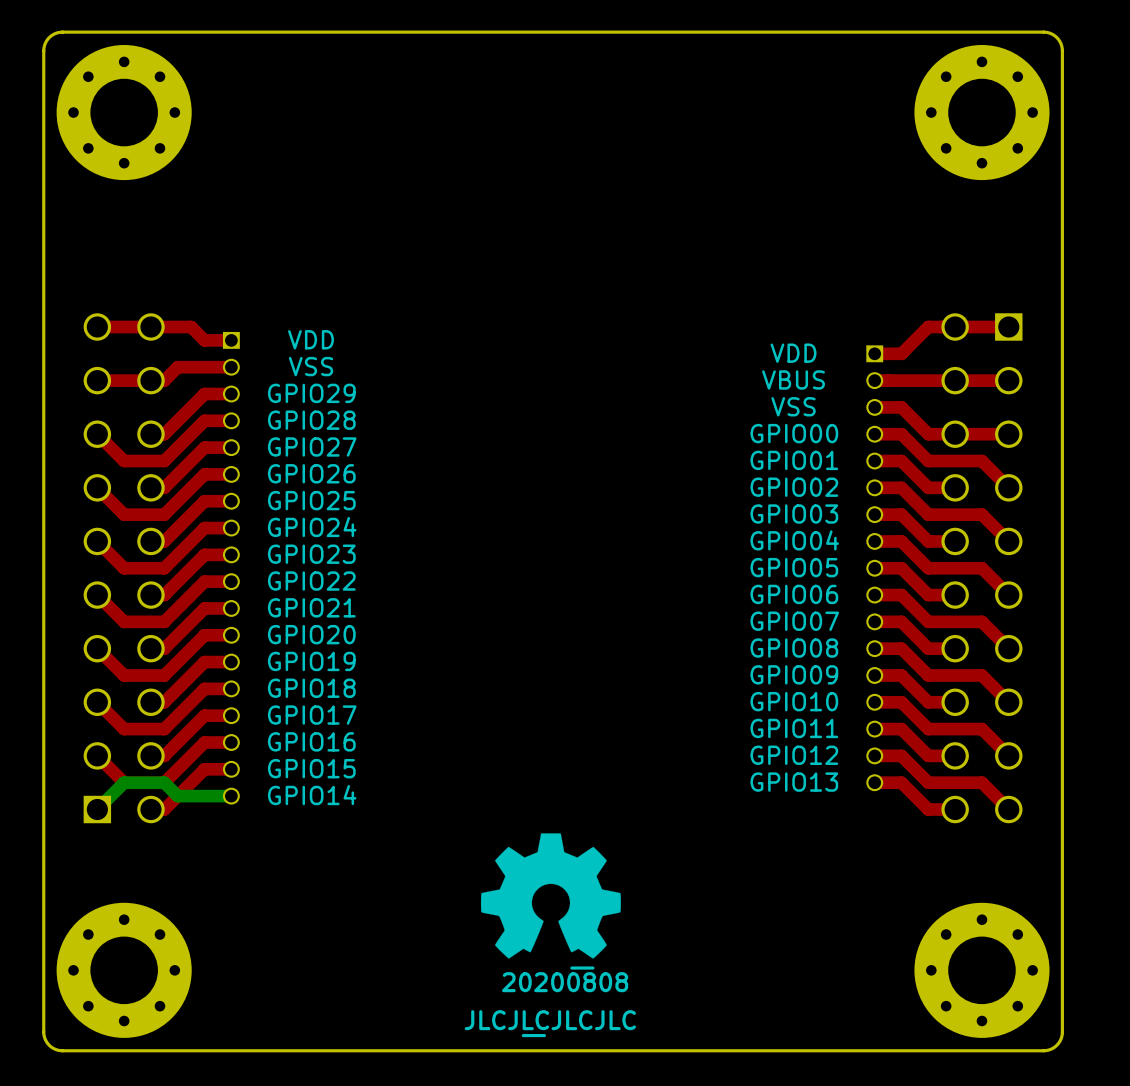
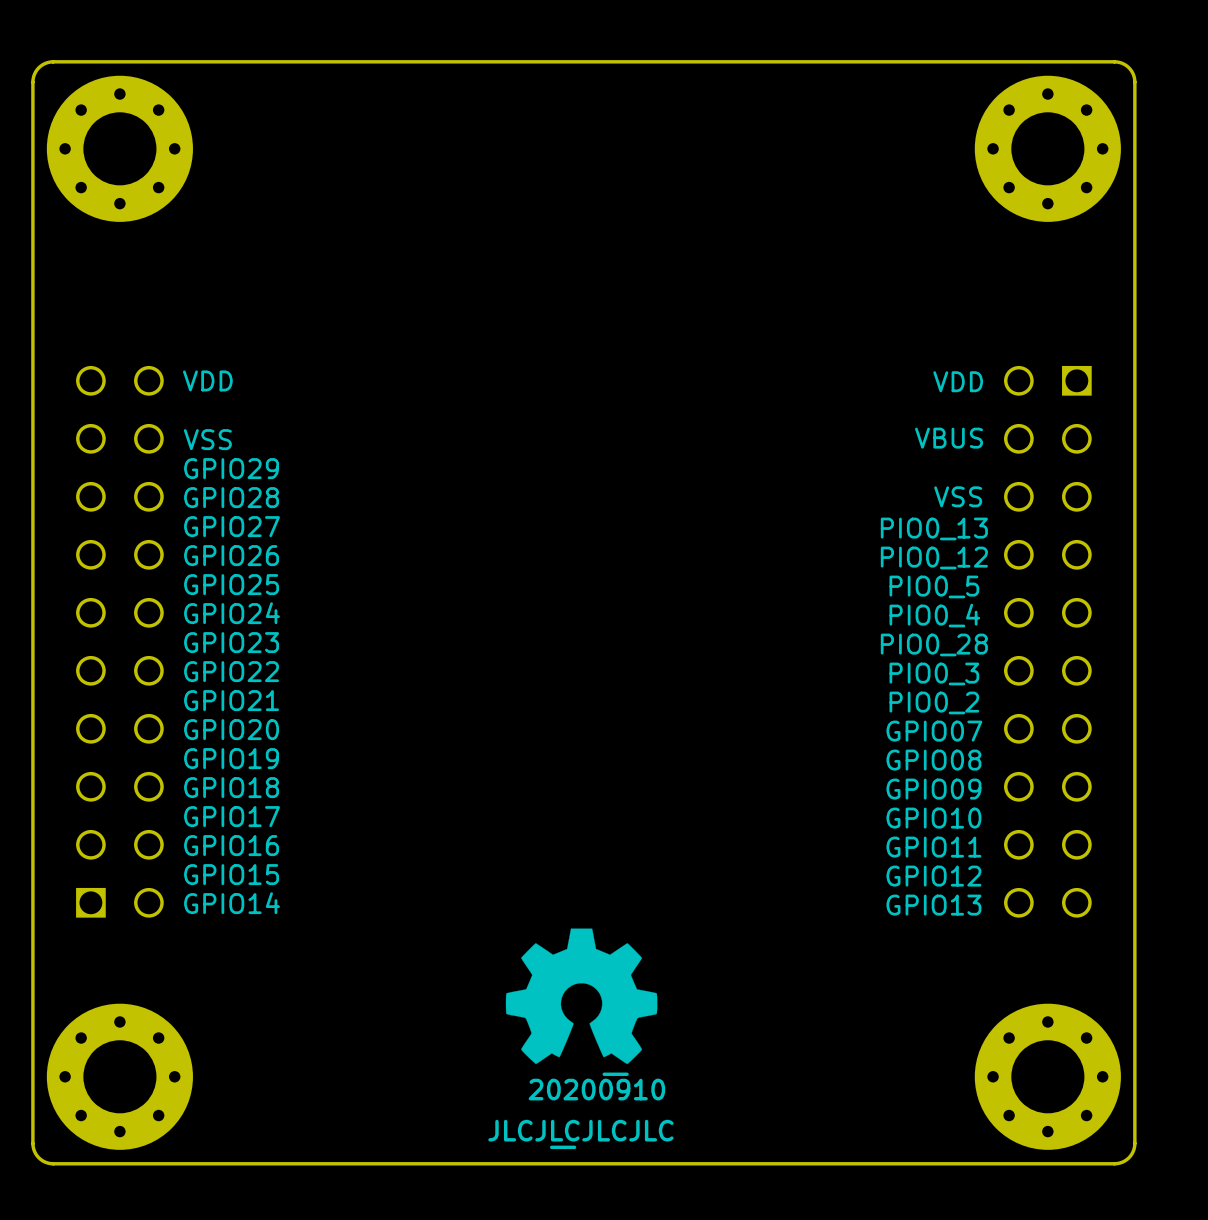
top track: (97, 326) (191, 326) (204, 340) (231, 340) -> none
top track: (1008, 326) (928, 326) (901, 353) (874, 353) -> none
text position: VDD (311, 339) -> VDD (207, 380)
text position: VDD (793, 353) -> VDD (958, 381)
text position: VSS (311, 366) -> VSS (207, 439)
top track: (231, 367) (177, 367) (164, 380) (97, 380) -> none
text position: VBUS (793, 379) -> VBUS (949, 438)
top track: (1008, 380) (874, 380) -> none
text position: GPIO29 (311, 393) -> GPIO29 (231, 468)
top track: (231, 394) (204, 394) (164, 434) (150, 434) -> none
text position: VSS (793, 406) -> VSS (958, 496)
top track: (874, 407) (901, 407) (928, 434) (1008, 434) -> none
top track: (231, 420) (204, 420) (164, 461) (124, 461) (97, 434) -> none
text position: GPIO28 (311, 420) -> GPIO28 (231, 497)
text: GPIO00 (794, 433) -> none
top track: (874, 434) (901, 434) (928, 461) (981, 461) (1008, 487) -> none
text position: GPIO27 (312, 446) -> GPIO27 (232, 526)
top track: (231, 447) (204, 447) (164, 487) (150, 487) -> none
text: GPIO01 (794, 460) -> none
top track: (874, 461) (901, 461) (928, 487) (955, 487) -> none
text: none -> PIO0_13 (934, 528)
text position: GPIO26 (311, 473) -> GPIO26 (231, 555)
top track: (231, 474) (204, 474) (164, 514) (124, 514) (97, 487) -> none
text: GPIO02 (794, 487) -> none
top track: (874, 487) (901, 487) (928, 514) (981, 514) (1008, 541) -> none
text: none -> PIO0_12 (934, 557)
text position: GPIO25 (311, 500) -> GPIO25 (231, 584)
top track: (231, 501) (204, 501) (164, 541) (150, 541) -> none
text: GPIO03 (794, 514) -> none
top track: (874, 514) (901, 514) (928, 541) (955, 541) -> none
text: none -> PIO0_5 (934, 586)
text position: GPIO24 (312, 527) -> GPIO24 (232, 613)
top track: (231, 528) (204, 528) (164, 568) (124, 568) (97, 541) -> none
text: GPIO04 (794, 540) -> none
top track: (874, 541) (901, 541) (928, 568) (981, 568) (1008, 595) -> none
text: none -> PIO0_4 (934, 615)
top track: (231, 554) (204, 554) (164, 595) (150, 595) -> none
text position: GPIO23 (311, 554) -> GPIO23 (231, 642)
text: GPIO05 (794, 567) -> none
part: (231, 568) -> none
top track: (874, 568) (901, 568) (928, 595) (955, 595) -> none
part: (874, 568) -> none
text: none -> PIO0_28 (934, 644)
top track: (231, 581) (204, 581) (164, 621) (124, 621) (97, 595) -> none
text position: GPIO22 (311, 581) -> GPIO22 (231, 671)
text: GPIO06 (794, 594) -> none
top track: (874, 595) (901, 595) (928, 621) (981, 621) (1008, 648) -> none
text: none -> PIO0_3 (934, 673)
text position: GPIO21 (311, 607) -> GPIO21 (231, 700)
top track: (231, 608) (204, 608) (164, 648) (150, 648) -> none
text position: GPIO07 (794, 621) -> GPIO07 (934, 731)
top track: (874, 621) (901, 621) (928, 648) (955, 648) -> none
text: none -> PIO0_2 (934, 702)
text position: GPIO20 (311, 634) -> GPIO20 (231, 729)
top track: (231, 635) (204, 635) (164, 675) (124, 675) (97, 648) -> none
text position: GPIO08 (794, 648) -> GPIO08 (933, 760)
top track: (874, 648) (901, 648) (928, 675) (981, 675) (1008, 702) -> none
text position: GPIO19 (311, 661) -> GPIO19 (231, 758)
top track: (231, 662) (204, 662) (164, 702) (150, 702) -> none
text position: GPIO09 (794, 674) -> GPIO09 (933, 789)
top track: (874, 675) (901, 675) (928, 702) (955, 702) -> none
top track: (231, 688) (204, 688) (164, 729) (124, 729) (97, 702) -> none
text position: GPIO18 (311, 688) -> GPIO18 (231, 787)
text position: GPIO10 (794, 701) -> GPIO10 (933, 818)
top track: (874, 702) (901, 702) (928, 729) (981, 729) (1008, 755) -> none
top track: (231, 715) (204, 715) (164, 755) (150, 755) -> none
text position: GPIO17 (312, 715) -> GPIO17 (232, 816)
text position: GPIO11 (794, 728) -> GPIO11 (933, 847)
top track: (874, 729) (901, 729) (928, 755) (955, 755) -> none
text position: GPIO16 (311, 741) -> GPIO16 (231, 845)
top track: (231, 742) (204, 742) (164, 782) (124, 782) (97, 755) -> none
text position: GPIO12 (794, 755) -> GPIO12 (933, 876)
top track: (874, 755) (901, 755) (928, 782) (981, 782) (1008, 809) -> none
text position: GPIO15 (311, 768) -> GPIO15 (231, 874)
top track: (231, 769) (204, 769) (164, 809) (150, 809) -> none
text position: GPIO13 (794, 782) -> GPIO13 (933, 905)
top track: (874, 782) (901, 782) (928, 809) (955, 809) -> none
text position: GPIO14 (312, 795) -> GPIO14 (232, 903)
bottom track: (231, 796) (177, 796) (164, 782) (124, 782) (97, 809) -> none
drawing shape: [502, 966, 629, 993] -> [528, 1072, 666, 1101]

